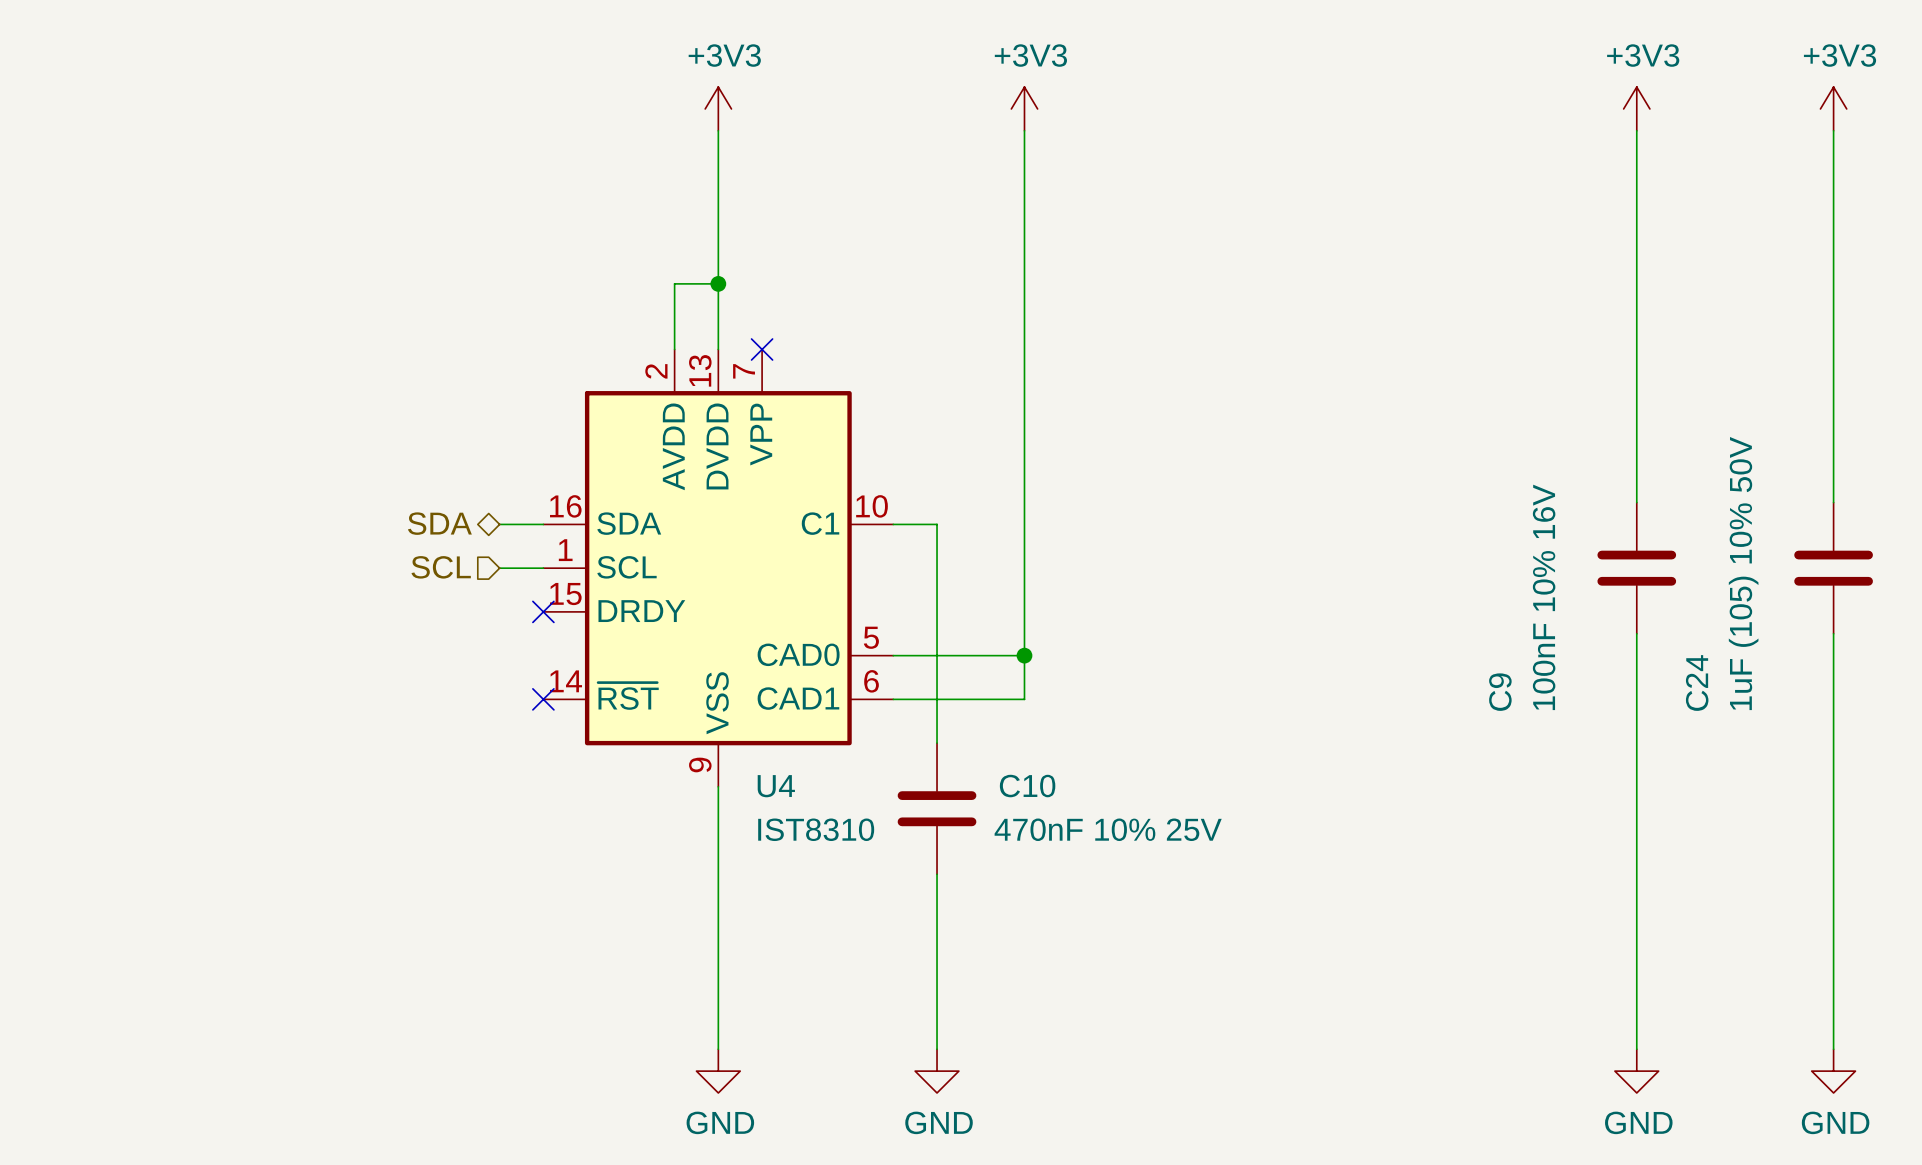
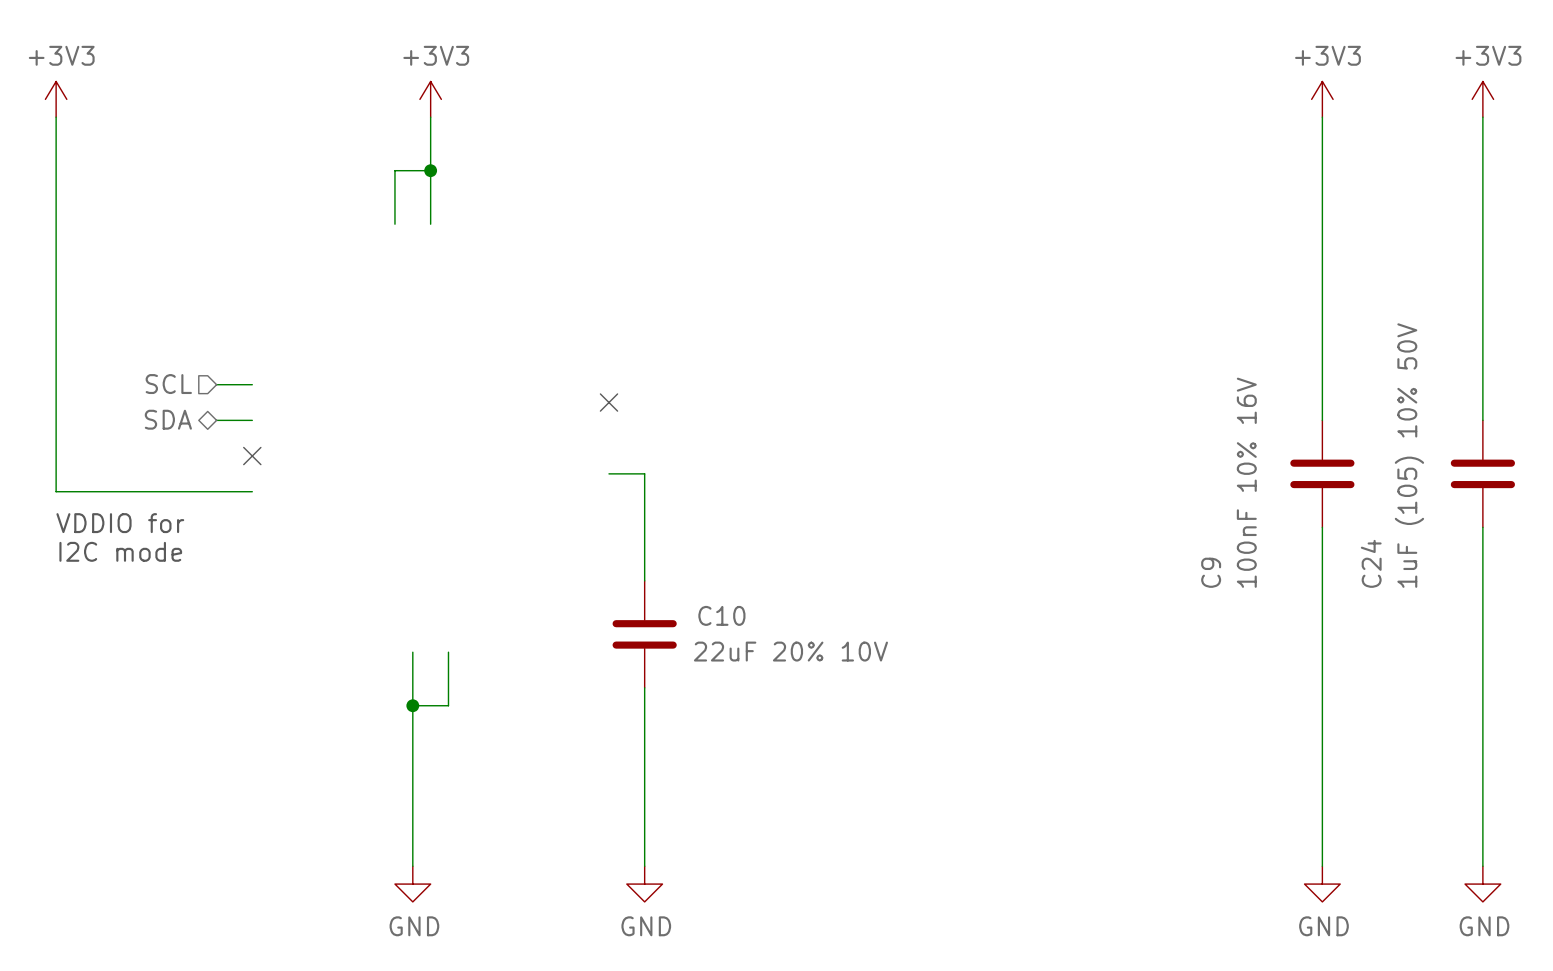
power symbol: none -> +3V3 (56, 99)
power symbol position: +3V3 (718, 108) -> +3V3 (430, 99)
power symbol: +3V3 (1024, 108) -> none
wire: none -> (56, 117) (56, 491) (252, 491)
wire: none -> (430, 117) (430, 224)
wire: (718, 130) (718, 349) -> none
wire: (1024, 130) (1024, 699) (893, 699) -> none
junction: none -> (430, 170)
wire: (718, 283) (674, 283) (674, 349) -> (430, 170) (394, 170) (394, 224)
junction: (718, 283) -> none
no-connect mark: (762, 349) -> none
no-connect mark: none -> (608, 402)
hierarchical label position: SDA (439, 523) -> SDA (168, 419)
wire: (499, 524) (543, 524) -> (216, 384) (252, 384)
wire: (893, 524) (937, 524) (937, 743) -> none
no-connect mark: none -> (252, 456)
hierarchical label position: SCL (441, 567) -> SCL (168, 384)
wire: (499, 568) (543, 568) -> (216, 420) (252, 420)
U4: IST8310 (718, 568) -> none
no-connect mark: (543, 611) -> none
text: none -> VDDIO for (120, 523)
wire: (893, 655) (1024, 655) -> none
junction: (1024, 655) -> none
text: none -> I2C mode (120, 551)
no-connect mark: (543, 699) -> none
wire: none -> (448, 652) (448, 705) (412, 705)
wire: (718, 786) (718, 1049) -> (412, 652) (412, 866)
C10 position: (937, 808) -> (644, 634)
C10 value: 470nF 10% 25V (1108, 829) -> 22uF 20% 10V (790, 651)
wire: none -> (644, 687) (644, 866)
junction: none -> (412, 705)
wire: (937, 874) (937, 1049) -> none
power symbol: none -> GND (412, 884)
power symbol: GND (718, 1071) -> none
power symbol: none -> GND (644, 884)
power symbol: GND (937, 1071) -> none

